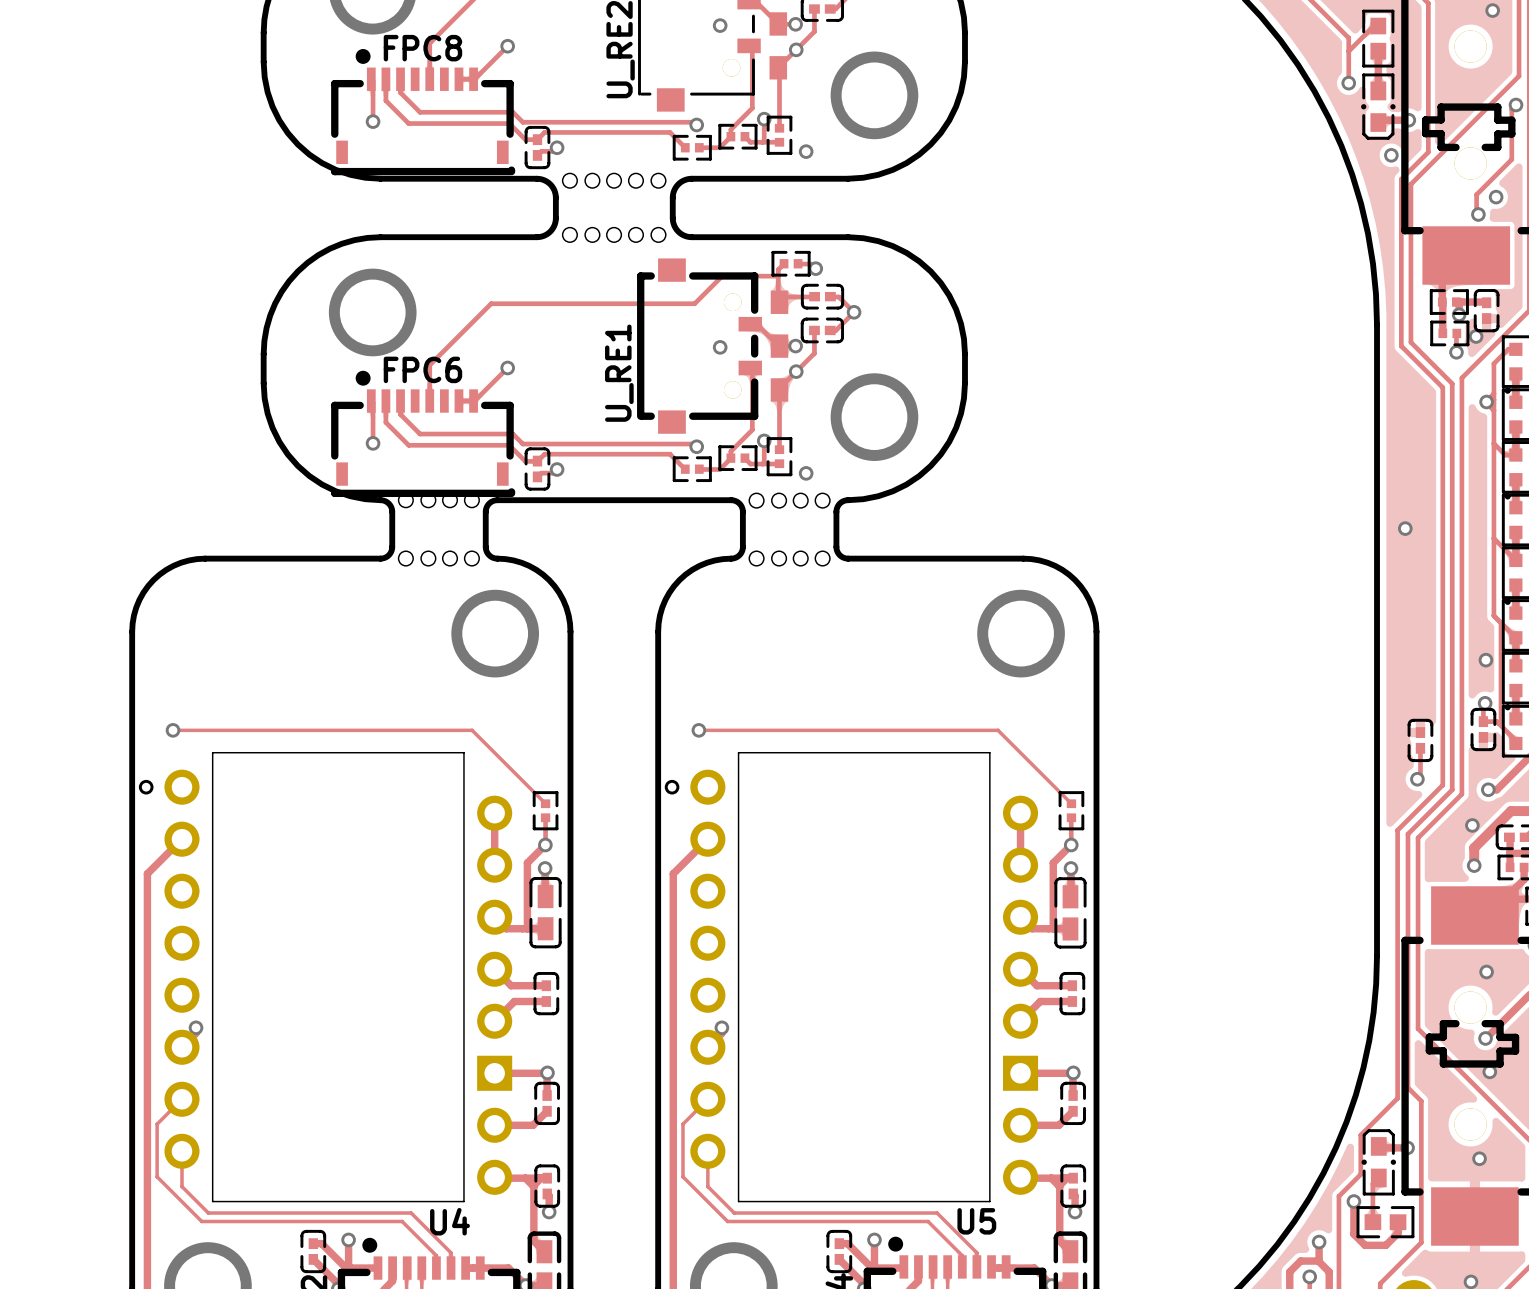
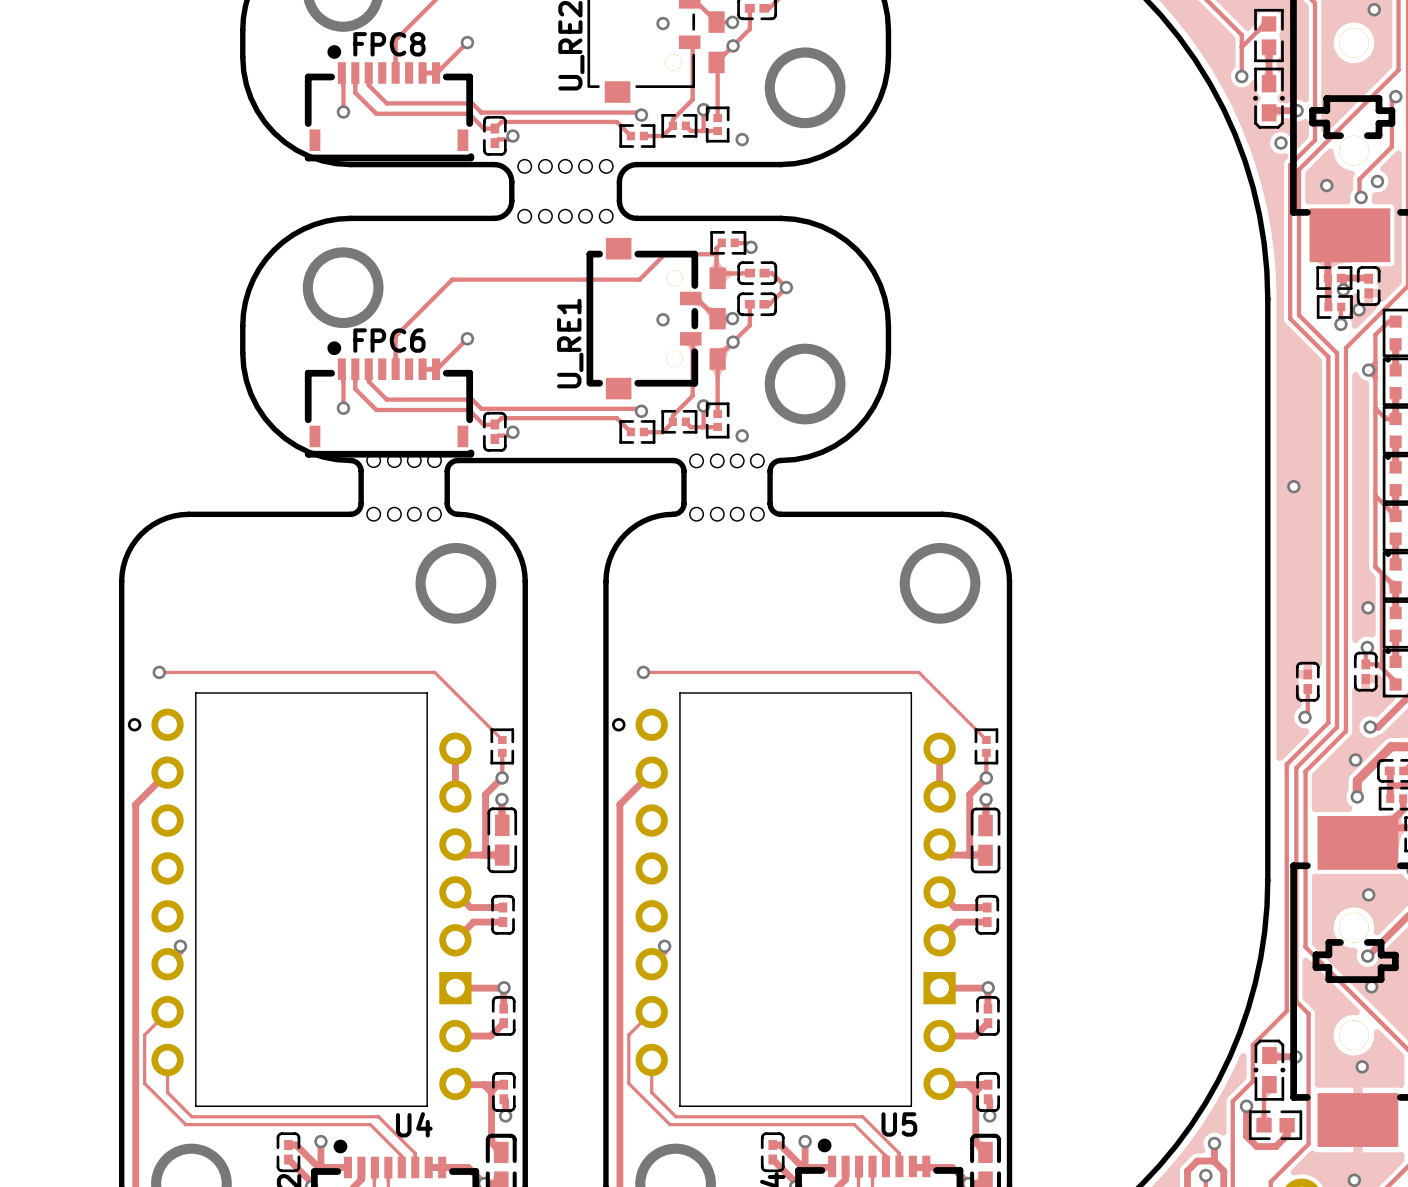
via: none -> (1326, 185)

